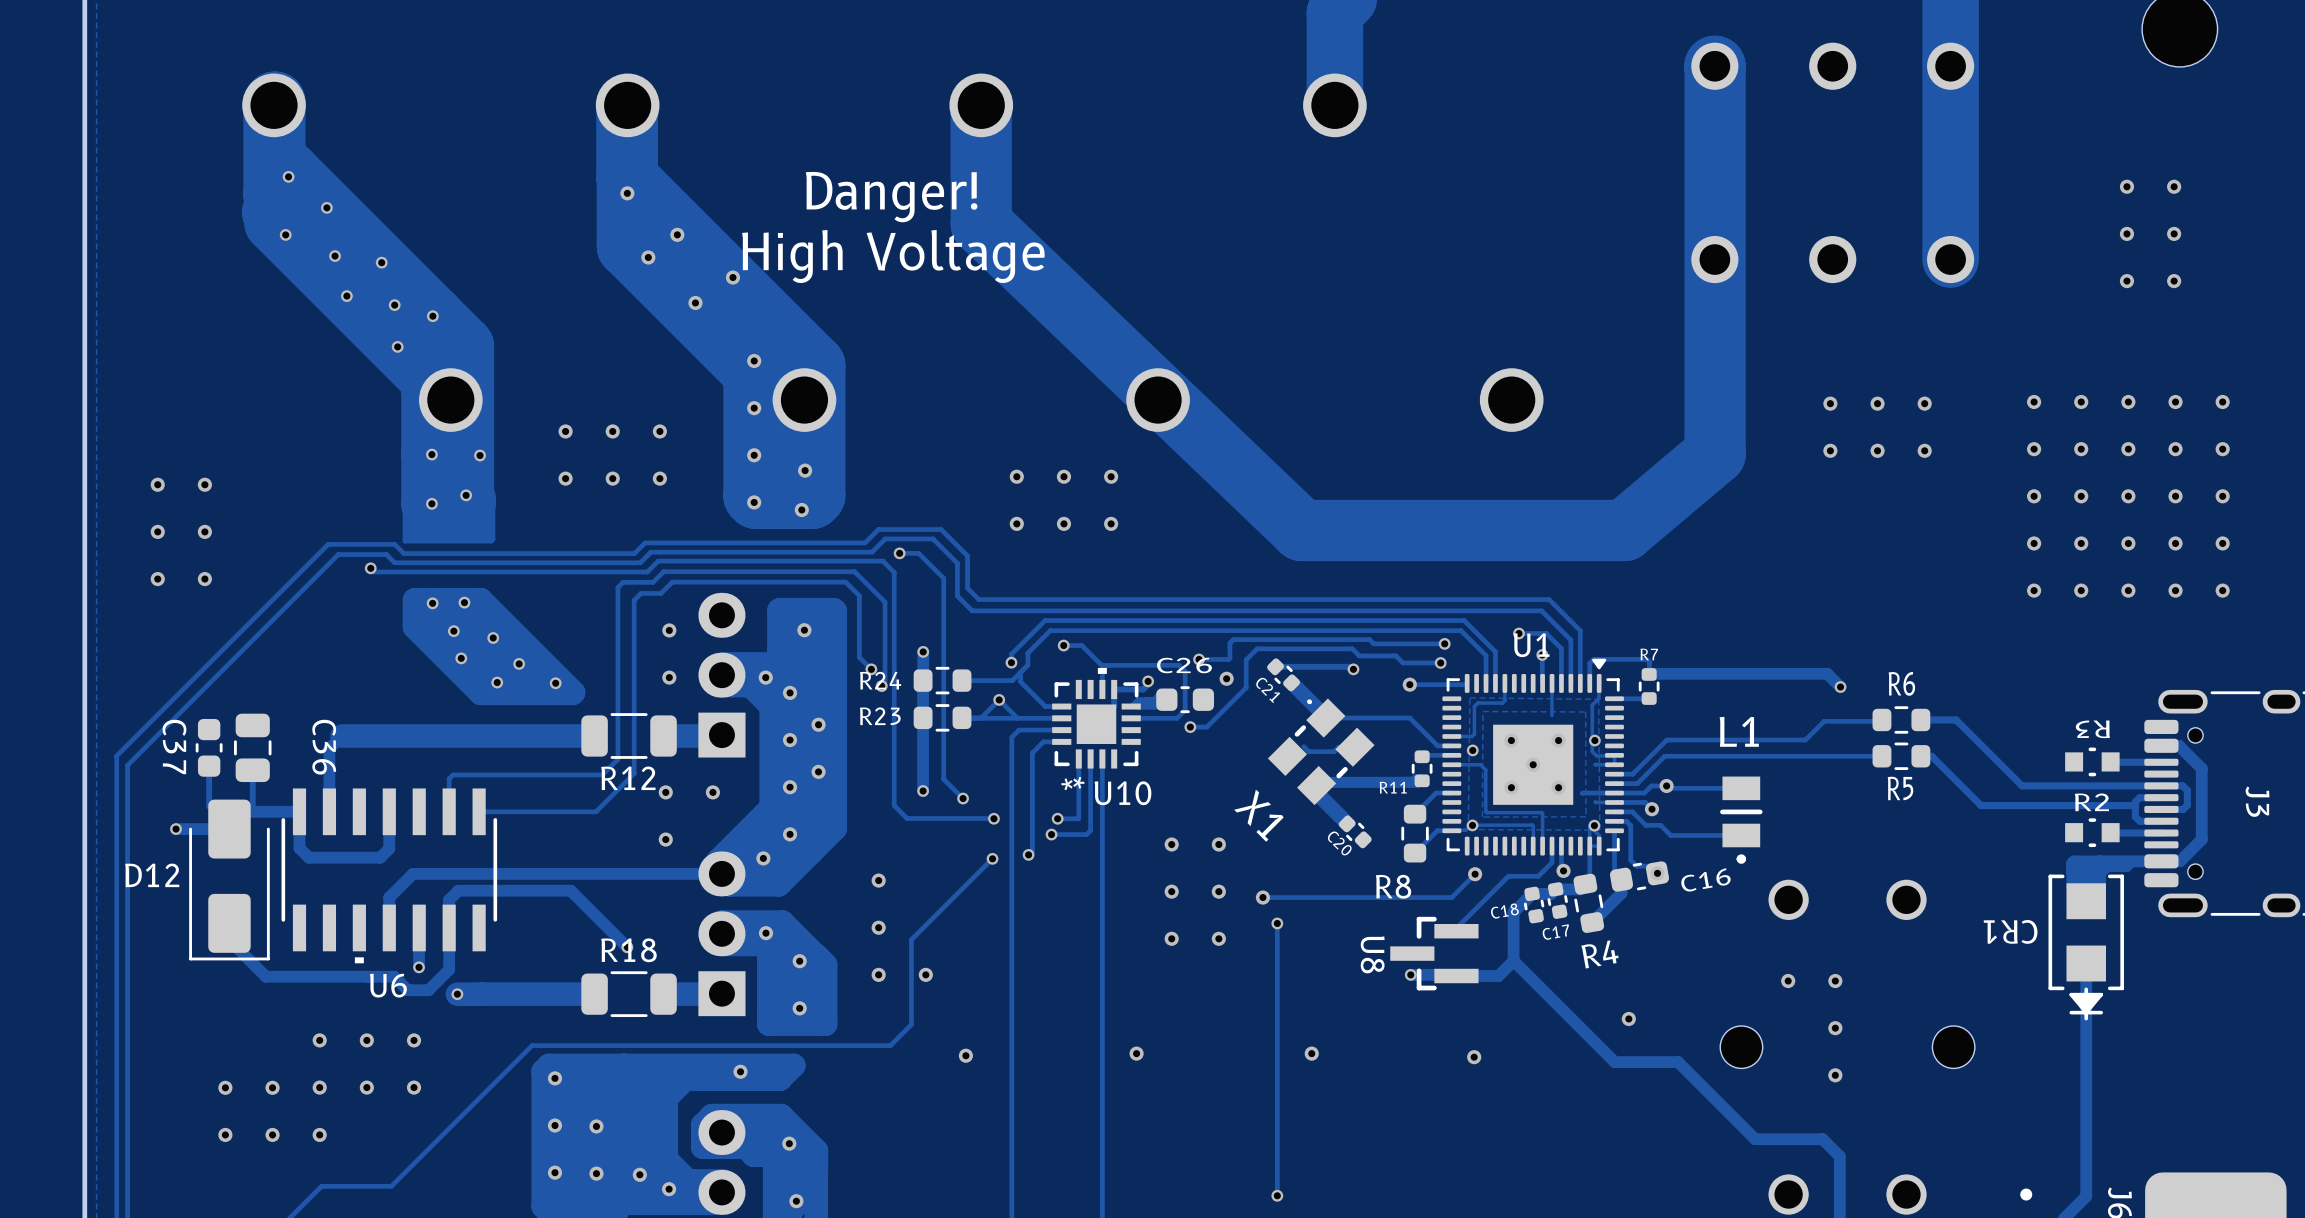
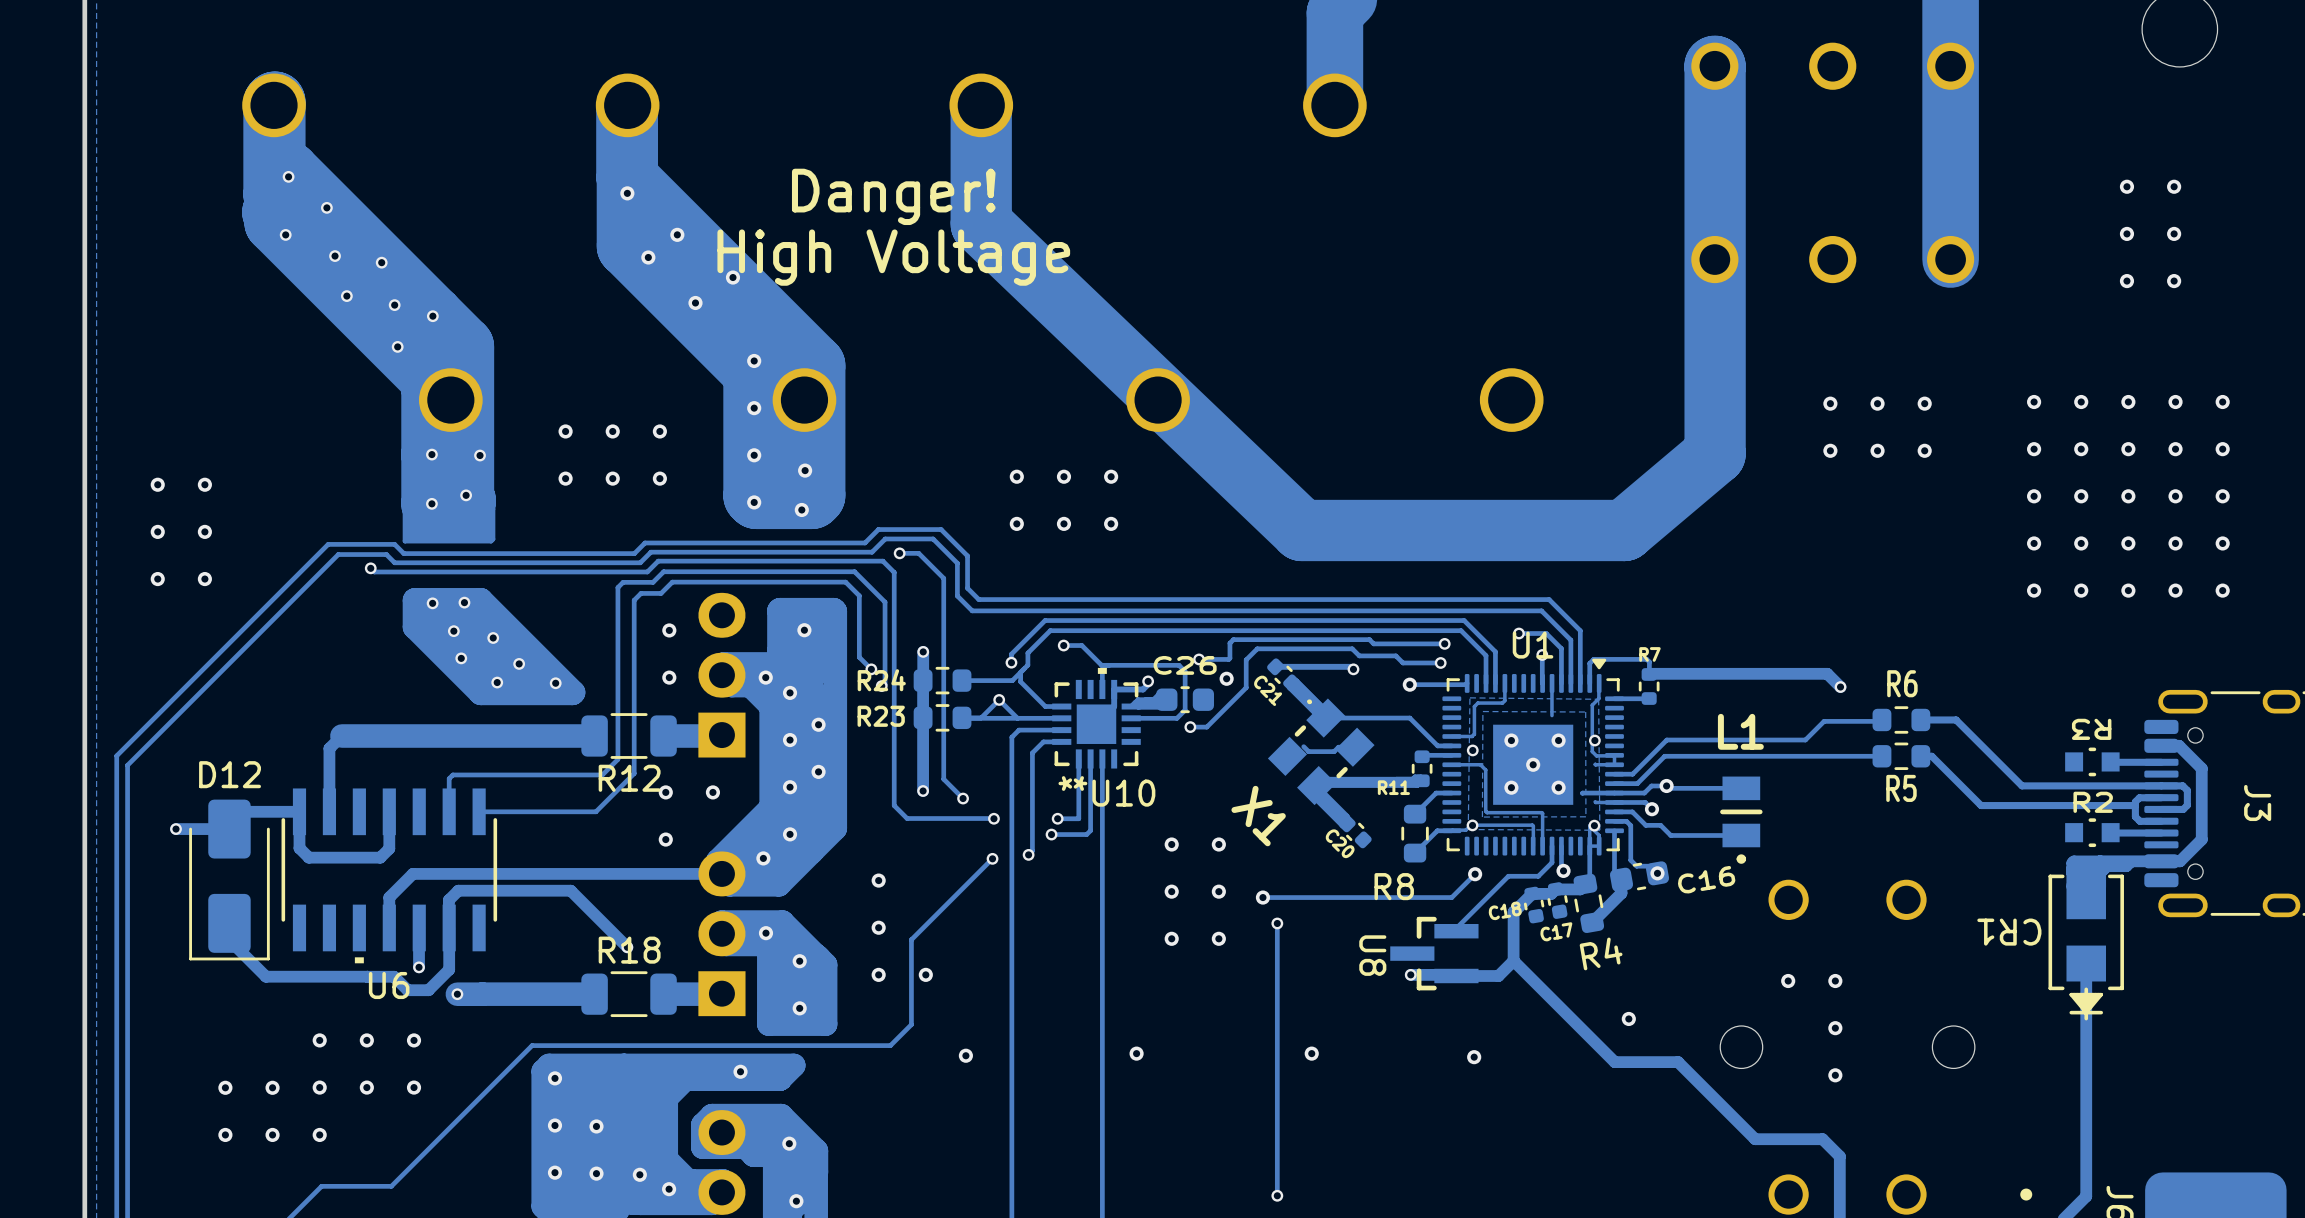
C37: (209, 747) -> none
C36: (252, 747) -> none
track: (209, 766) (209, 806) -> none
track: (252, 766) (252, 806) -> none
D12 name position: D12 (152, 875) -> D12 (230, 774)

